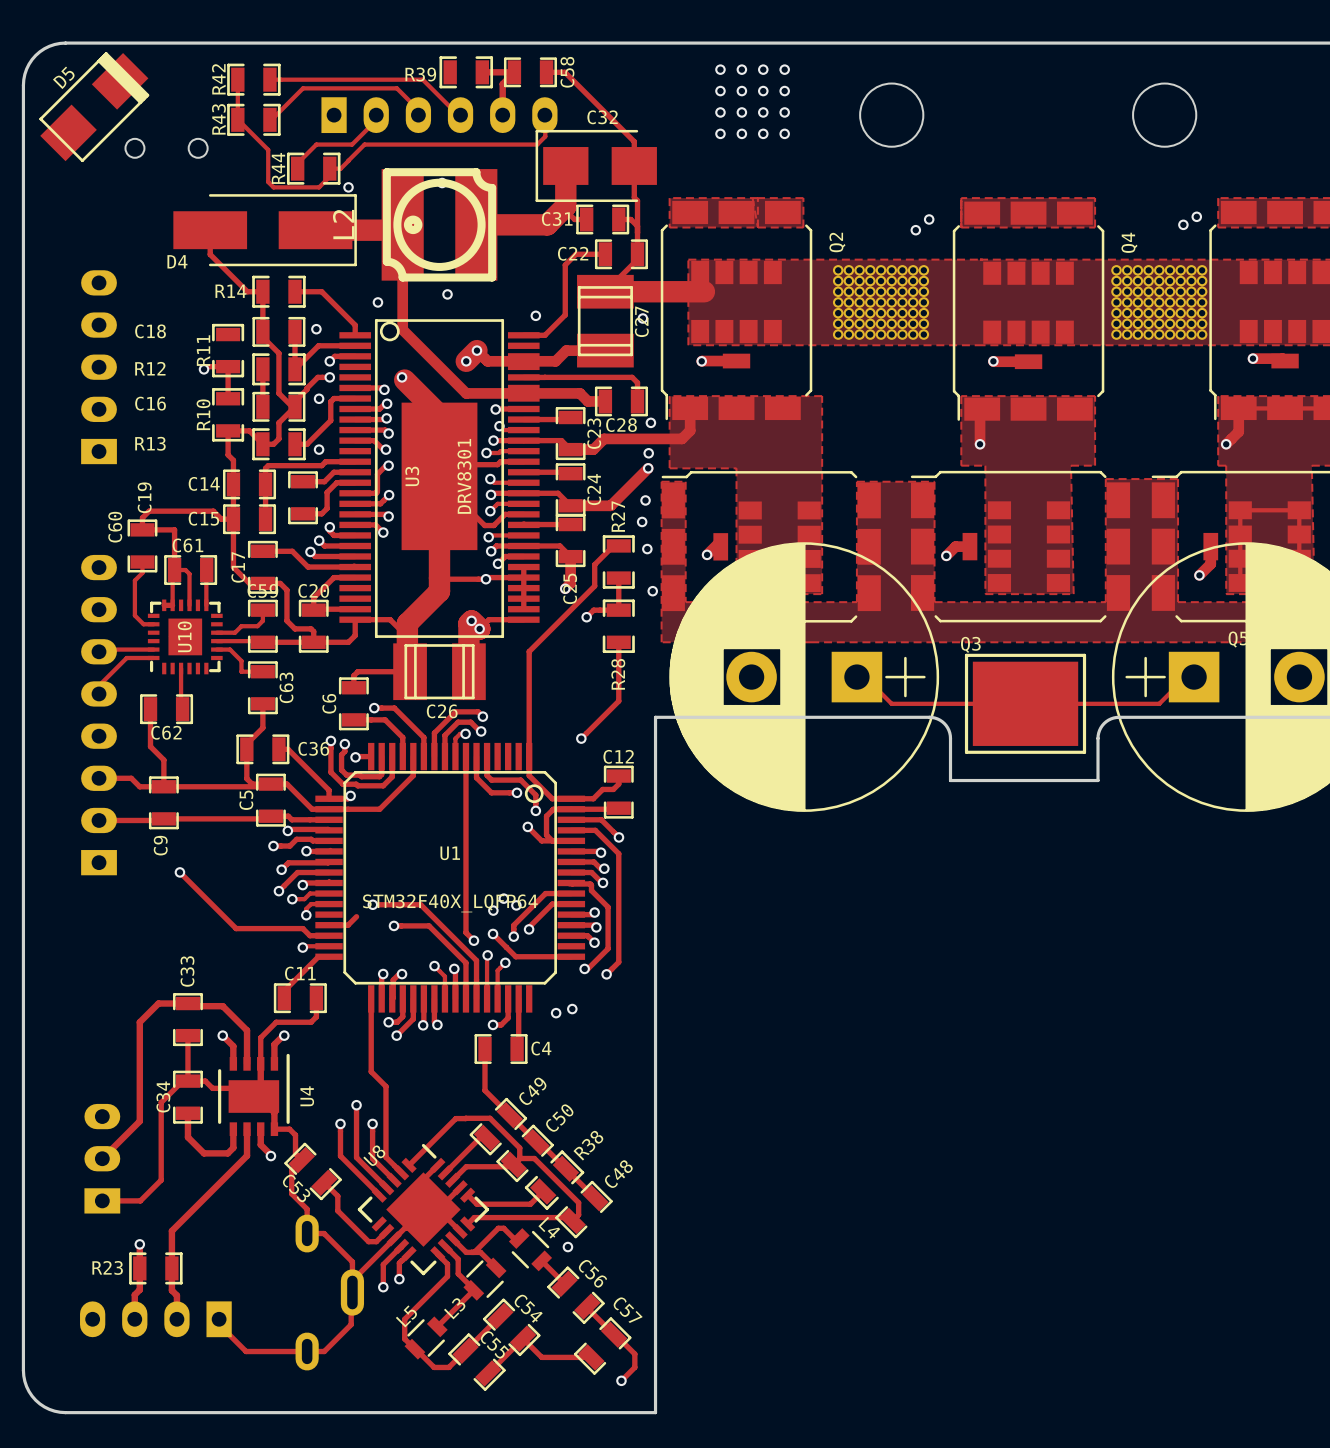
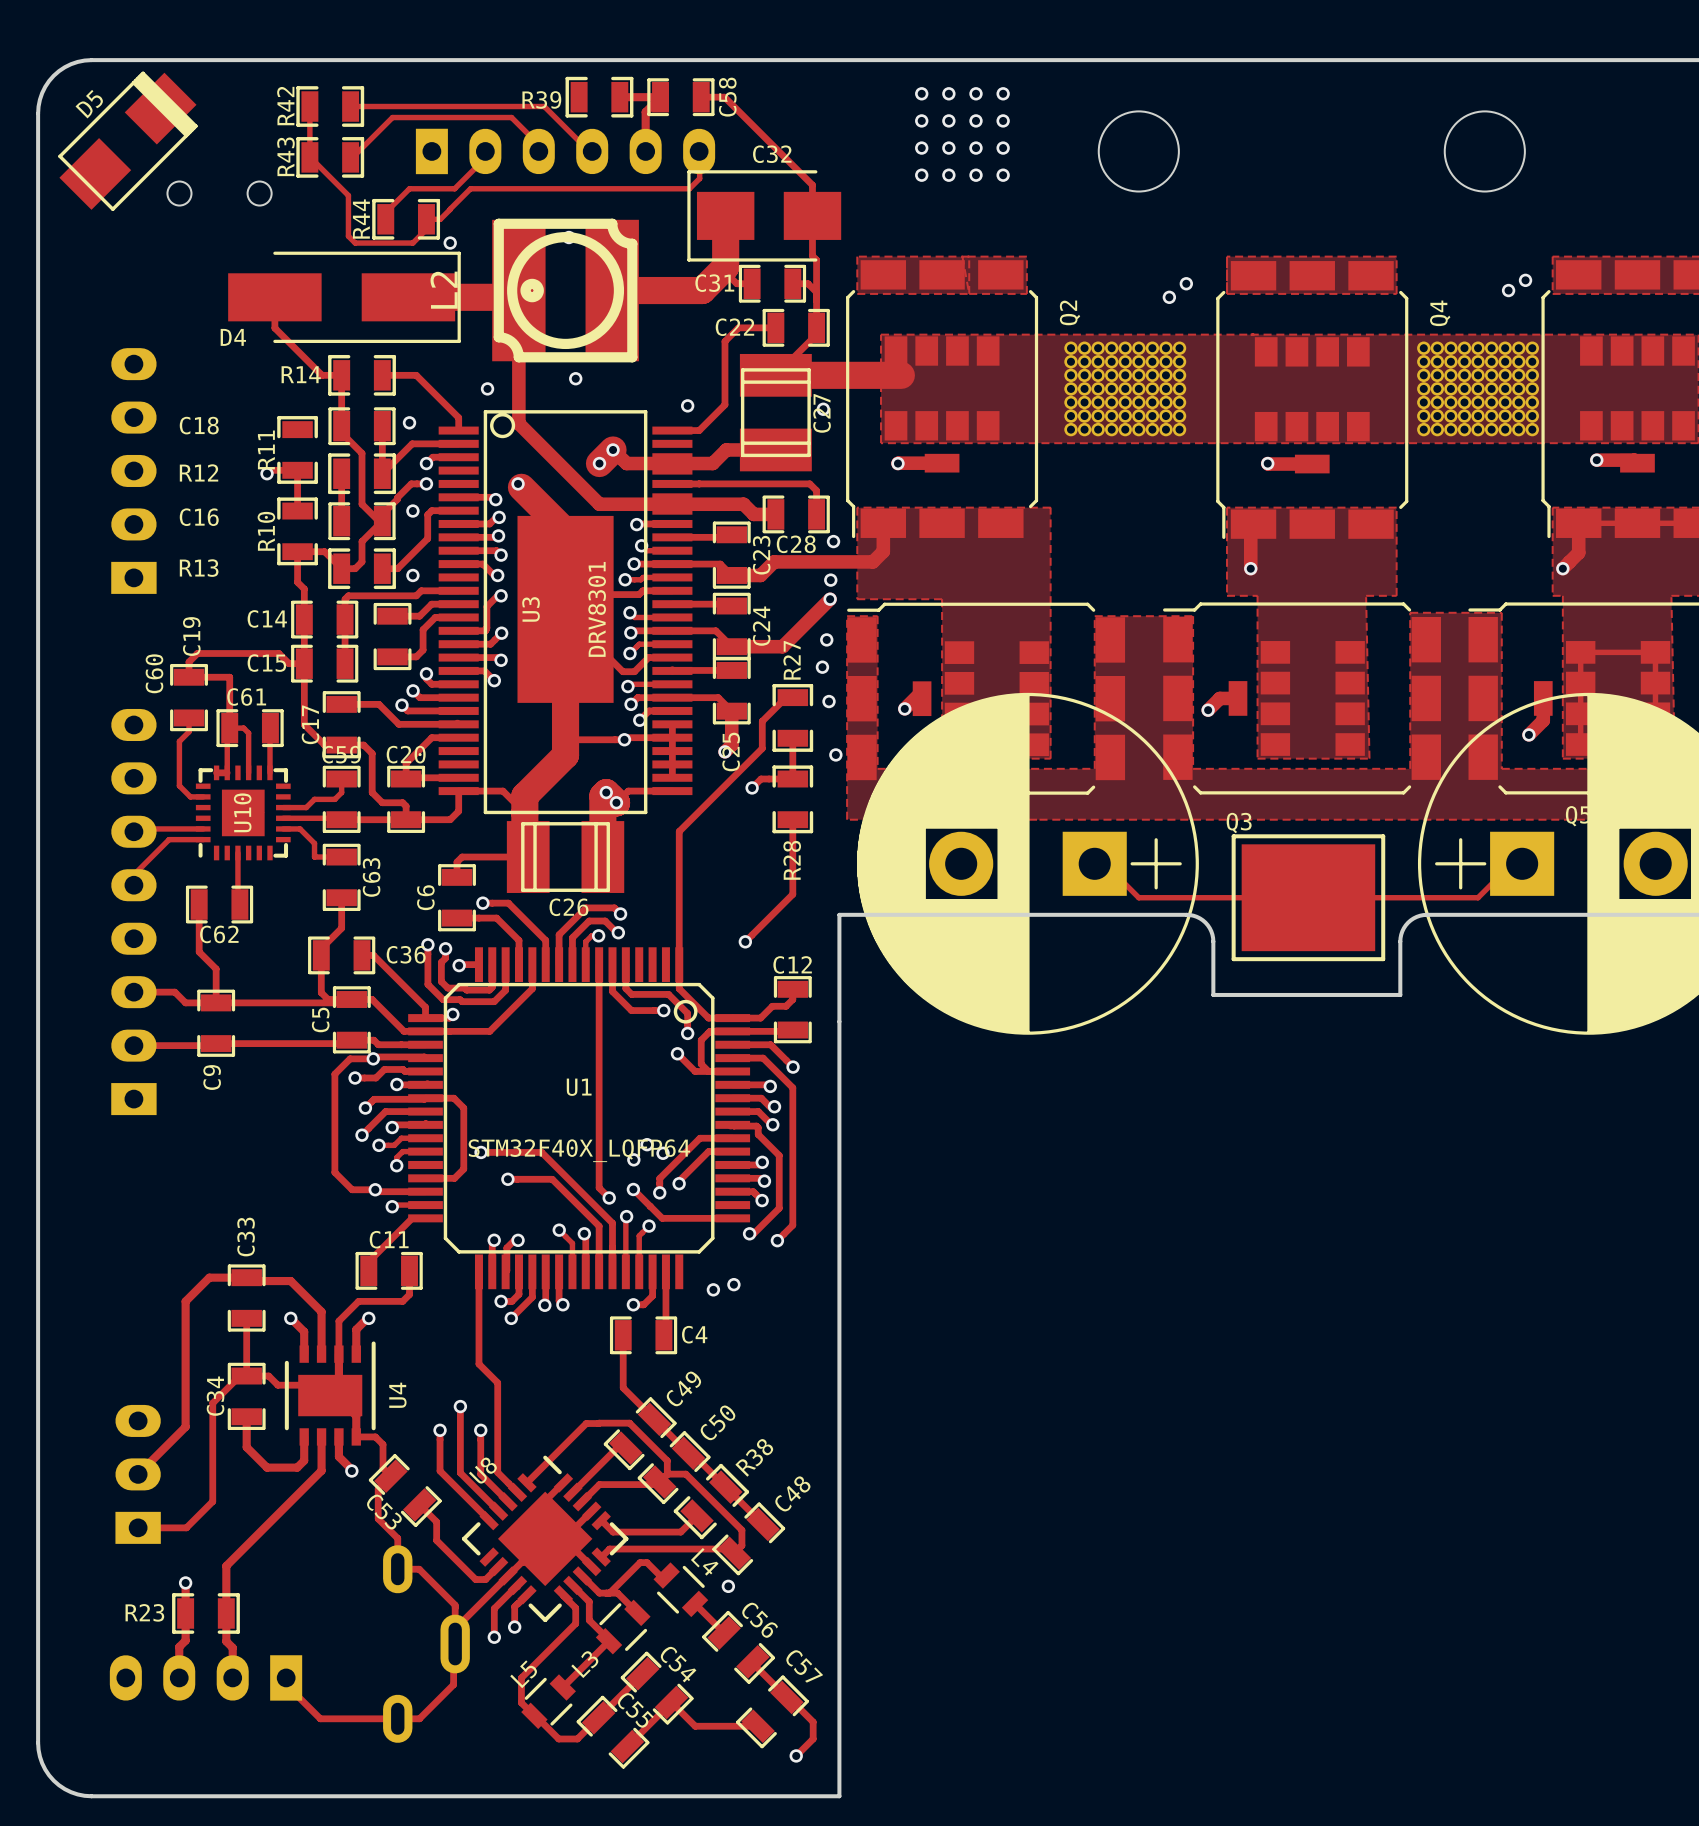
track: (179, 872) (236, 928) (302, 928) (309, 935) -> (373, 1058) (350, 1058) (334, 1074) (334, 1172) (352, 1189) (401, 1191)
via position: (179, 872) -> (375, 1189)
track: (356, 916) (348, 925) -> (425, 1098) (453, 1098) (463, 1108) (463, 1169) (454, 1178) (449, 1178)

